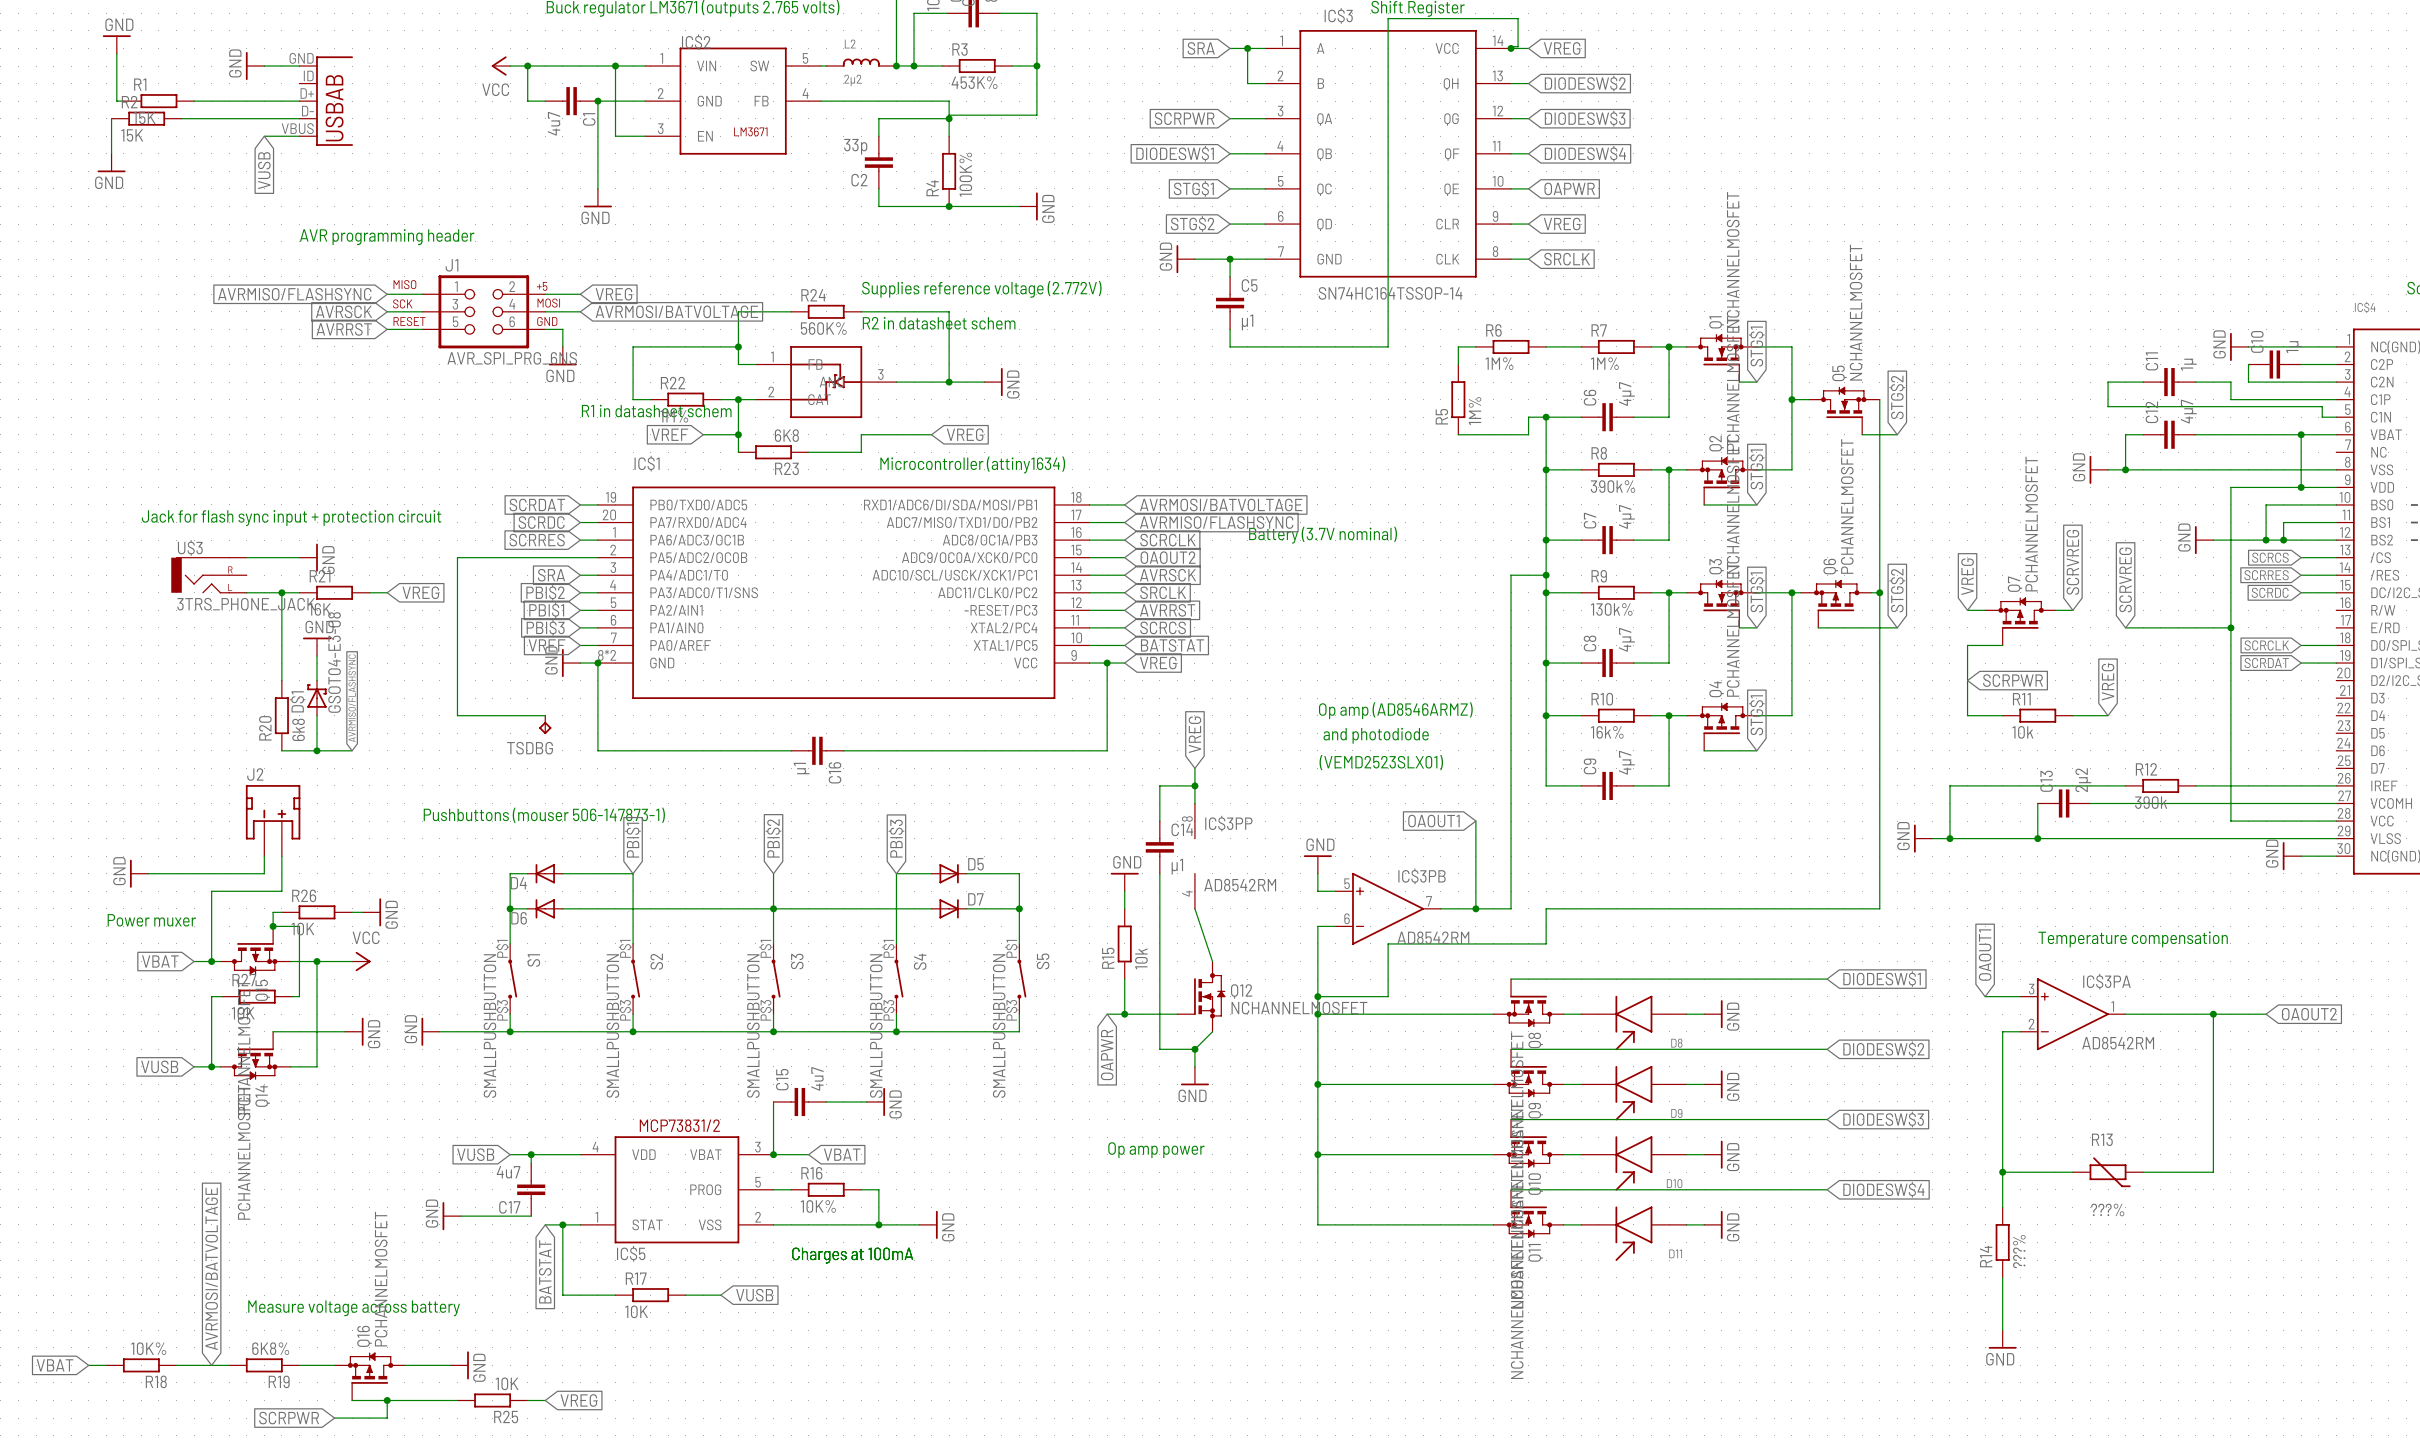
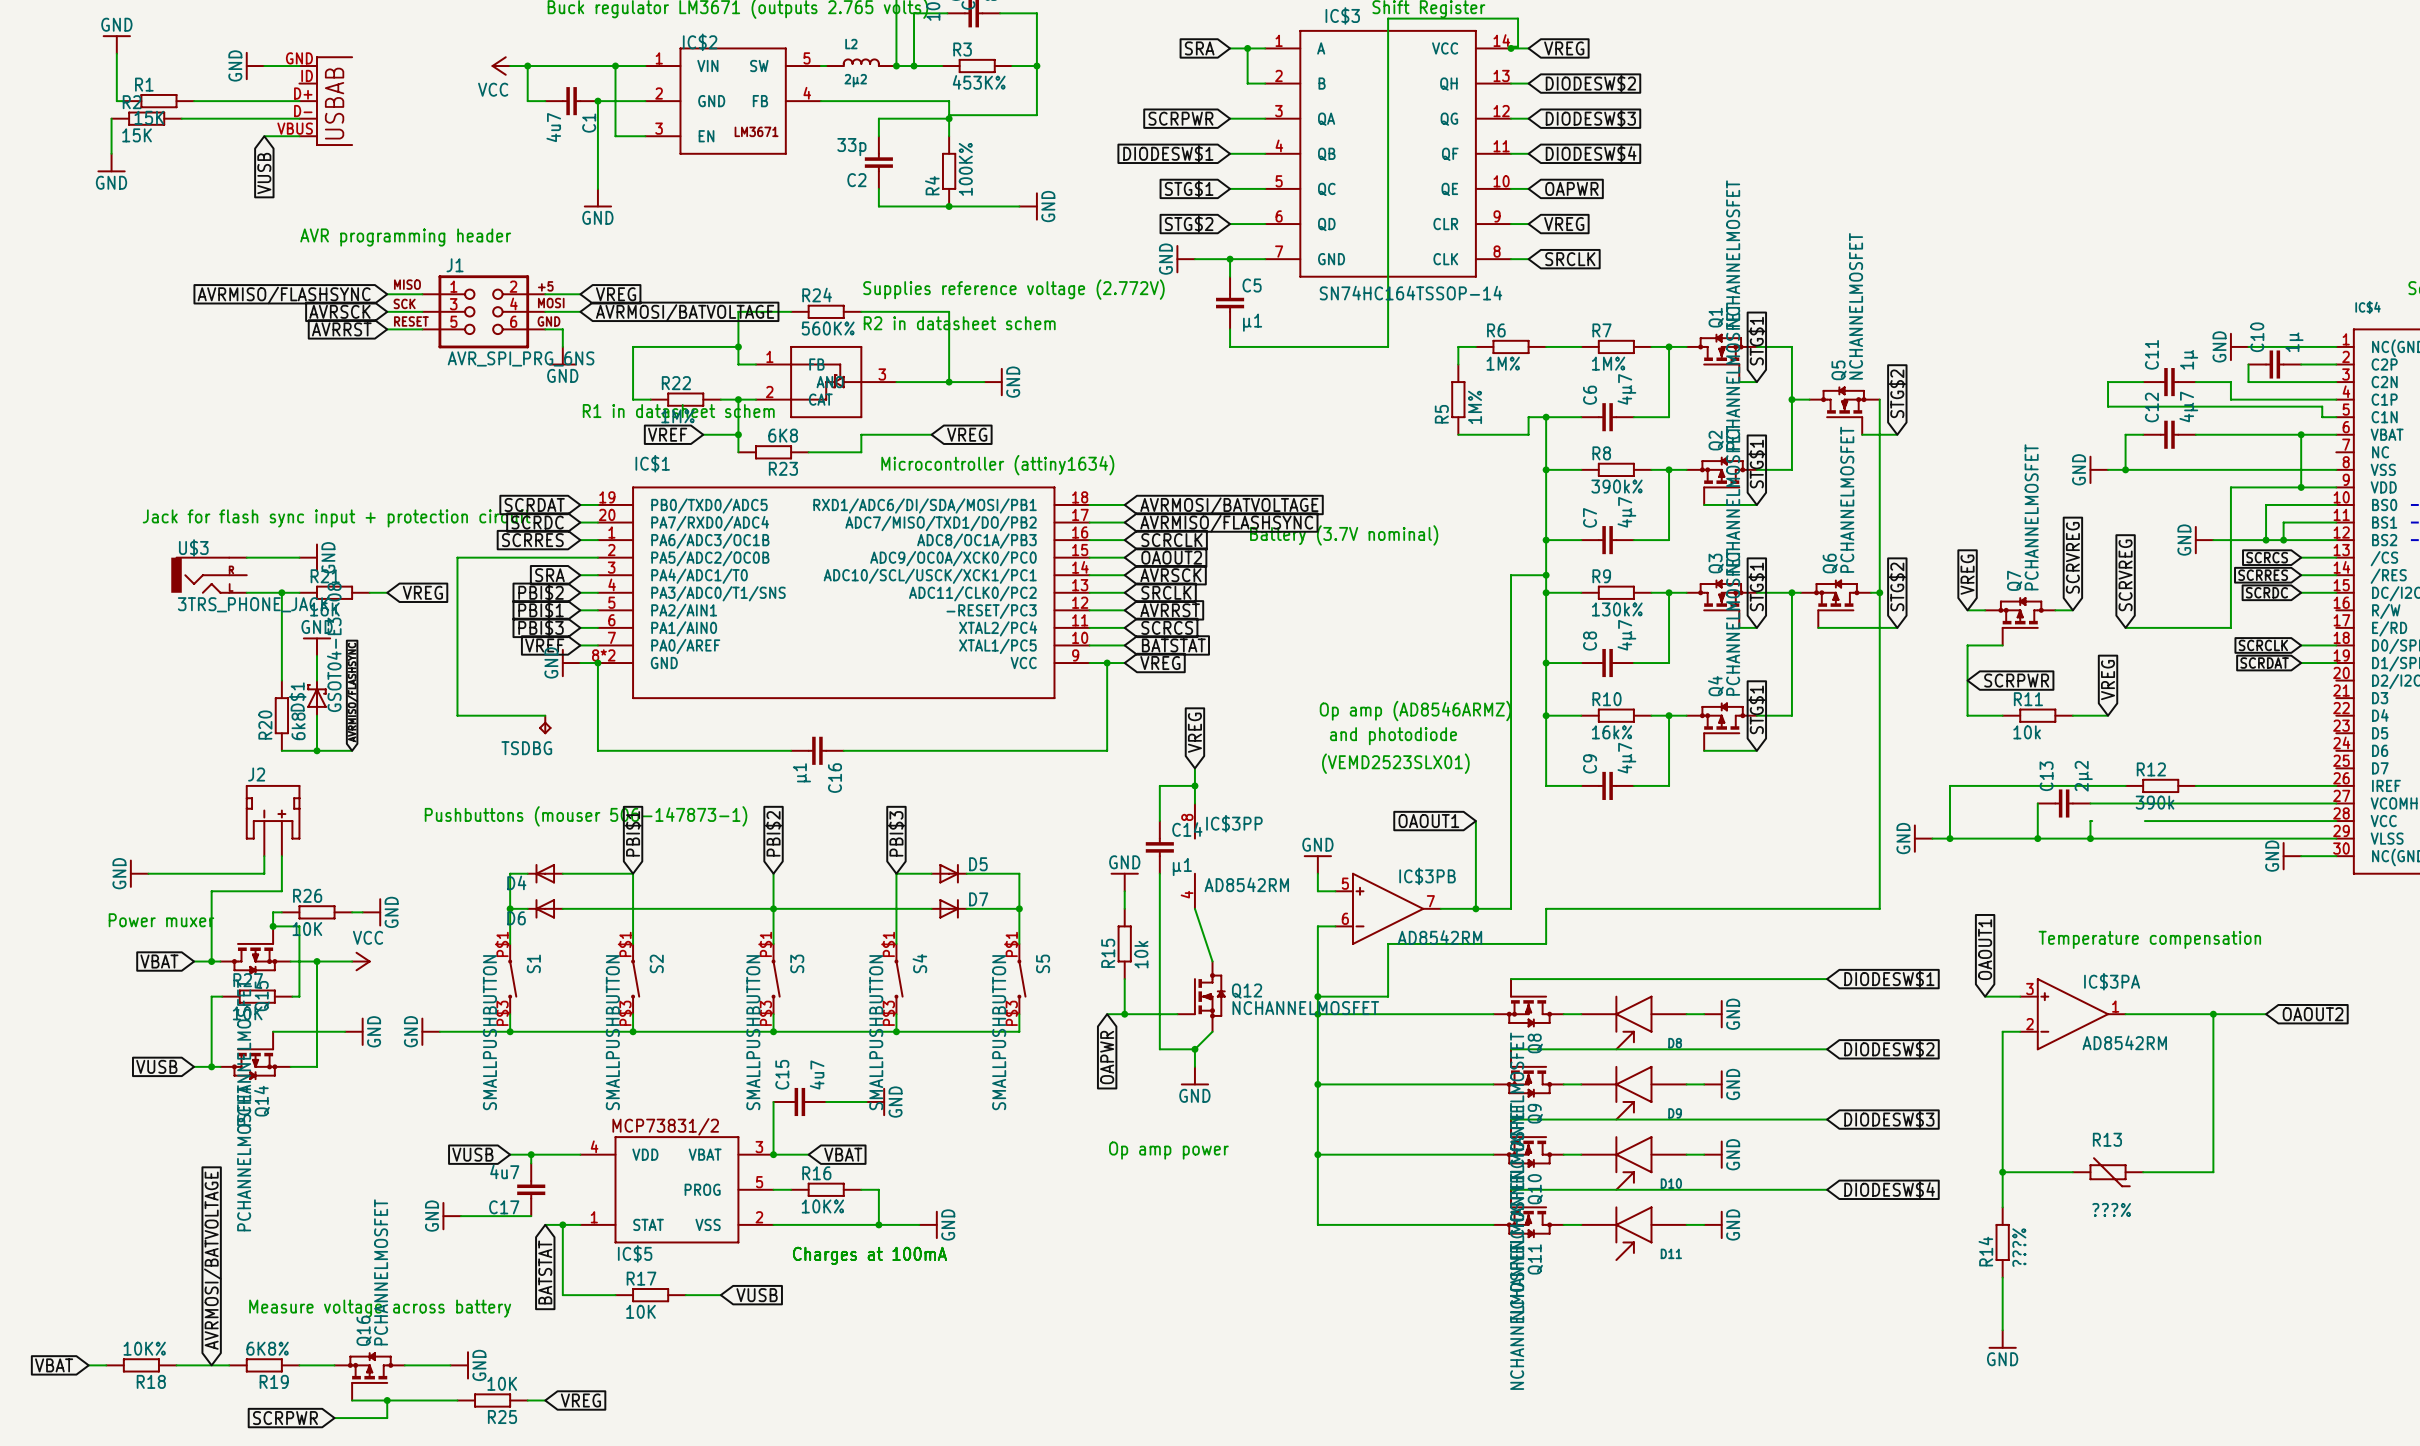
wire: (2230, 627) (2230, 821) -> (2144, 821) (2230, 821)
junction: (2230, 627) -> none
wire: none -> (2092, 821) (2090, 821) (2090, 838)
junction: none -> (2090, 838)

